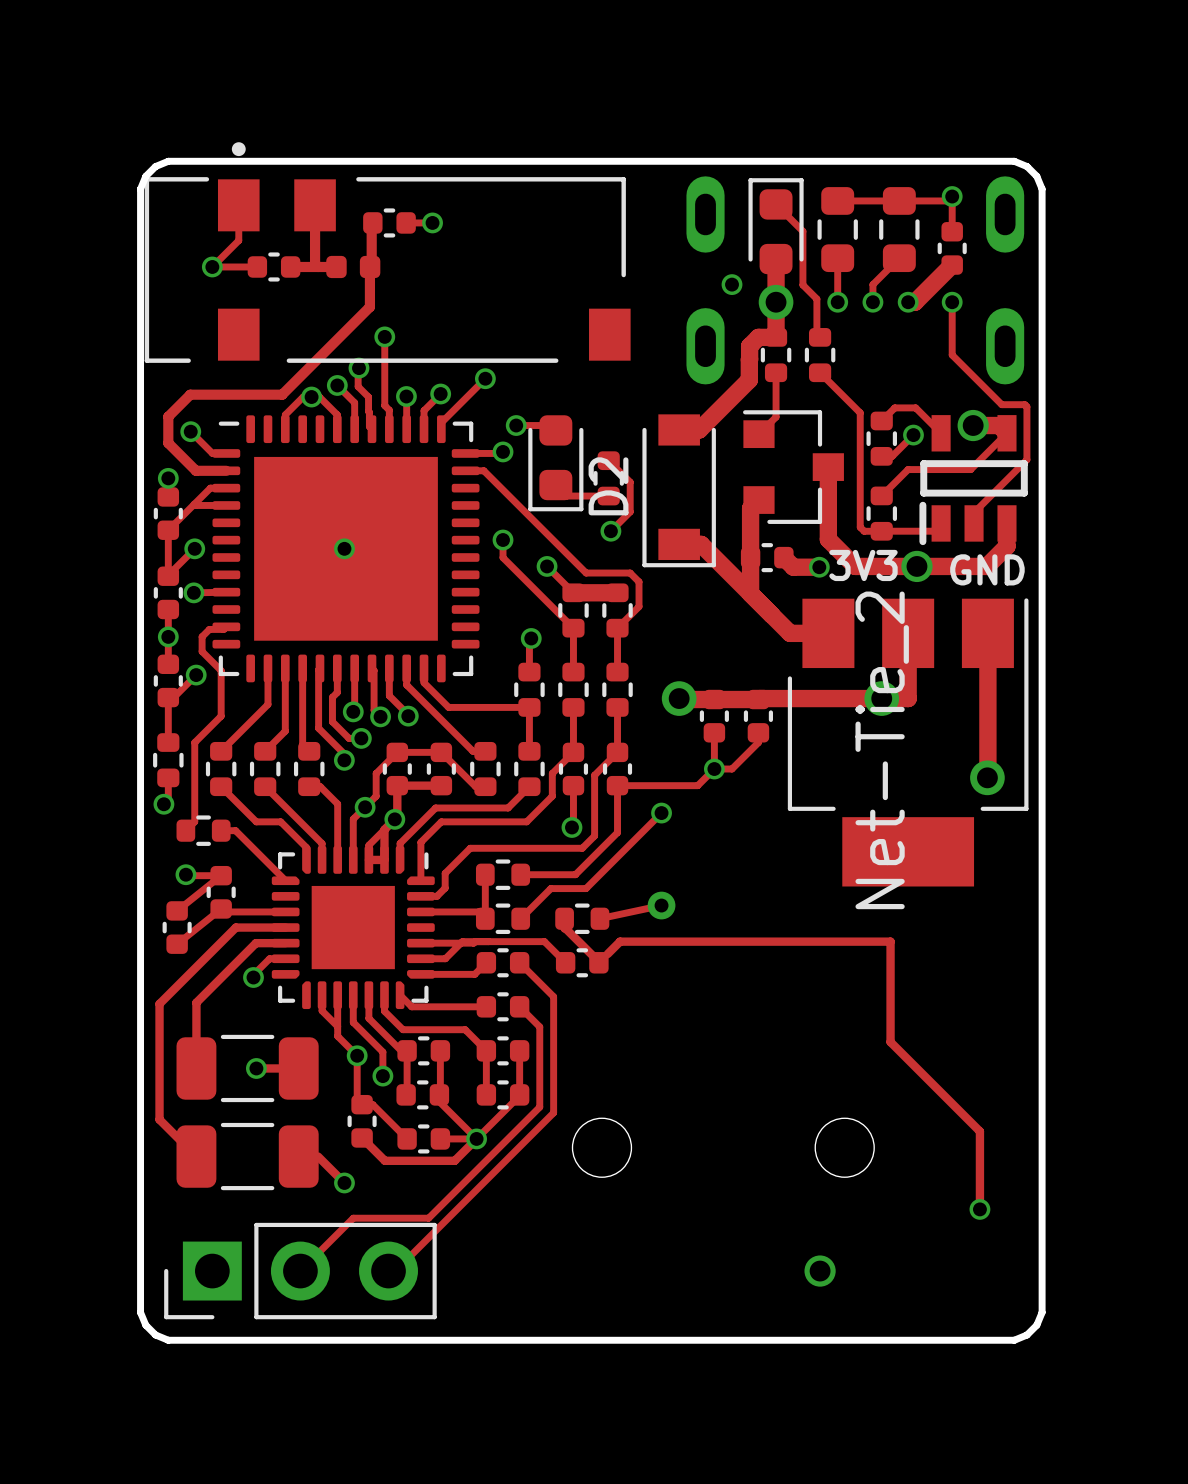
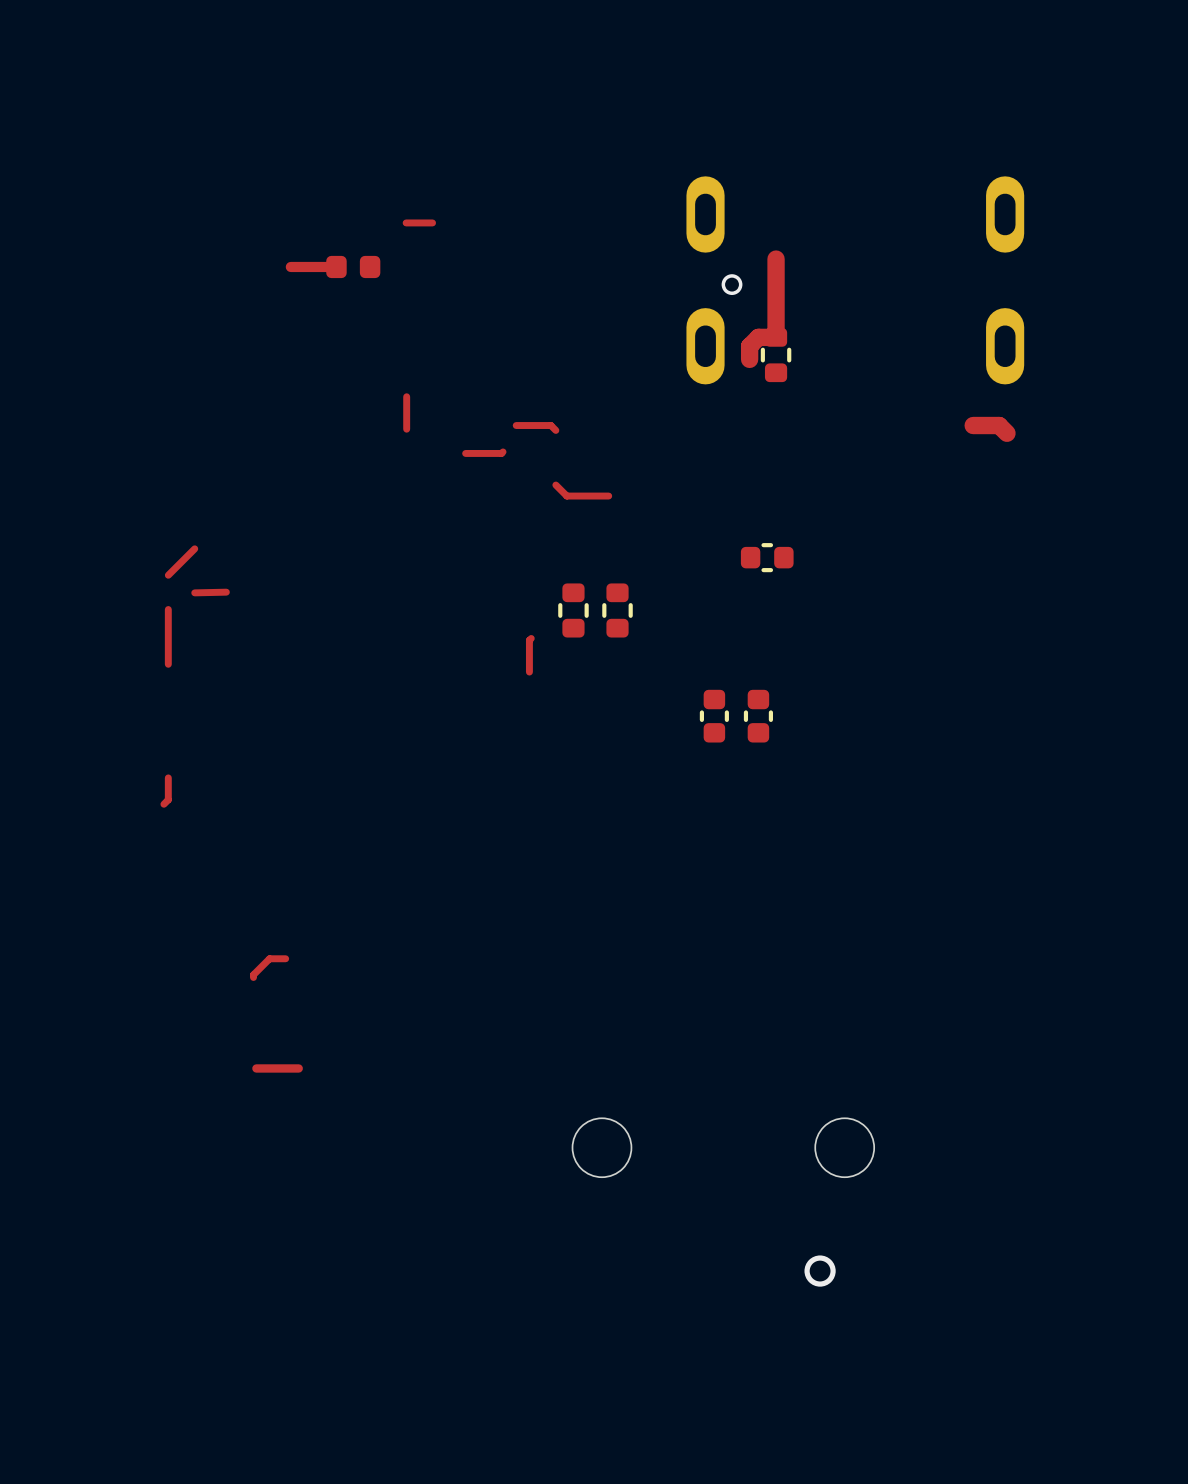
board edge: (168, 161) (1014, 161) (1027, 166) (1036, 176) (1042, 189) (1042, 1312) (1036, 1325) (1027, 1334) (1014, 1340) (168, 1340) (155, 1334) (145, 1325) (140, 1312) (140, 189) (145, 176) (155, 166) (168, 161) -> none
via: (952, 196) -> none
track: (837, 200) (947, 200) (952, 196) (952, 231) -> none
track: (776, 204) (802, 231) (802, 285) (816, 299) (816, 334) (820, 337) -> none
track: (238, 205) (238, 240) (212, 266) (257, 266) -> none
track: (315, 205) (315, 264) (318, 266) -> none
track: (371, 222) (369, 306) (282, 394) (190, 394) (168, 416) (168, 443) (195, 470) (226, 470) -> none
part: (389, 222) -> none
via: (432, 222) -> none
part: (776, 226) -> none
part: (837, 229) -> none
part: (899, 229) -> none
part: (952, 248) -> none
part: (387, 252) -> none
track: (837, 258) (837, 302) -> none
track: (899, 258) (872, 284) (872, 302) -> none
track: (952, 265) (915, 302) (908, 302) -> none
via: (212, 266) -> none
part: (274, 266) -> none
via: (776, 302) -> none
via: (837, 302) -> none
via: (872, 302) -> none
via: (908, 302) -> none
track: (952, 302) (952, 355) (1001, 404) (1024, 404) (1026, 406) (1026, 459) (974, 512) (974, 523) -> none
via: (952, 302) -> none
track: (384, 336) (384, 405) (389, 410) (389, 429) -> none
via: (384, 336) -> none
part: (820, 355) -> none
track: (749, 359) (749, 379) (699, 429) (679, 429) -> none
via: (358, 368) -> none
track: (776, 372) (776, 417) (758, 434) -> none
track: (820, 372) (860, 412) (860, 527) (864, 531) (933, 531) (941, 523) -> none
track: (358, 375) (358, 386) (368, 397) (369, 426) (372, 429) -> none
track: (485, 378) (441, 422) (441, 429) -> none
via: (485, 378) -> none
track: (337, 385) (354, 402) (354, 429) -> none
via: (337, 385) -> none
track: (440, 394) (424, 410) (424, 429) -> none
via: (440, 394) -> none
via: (406, 396) -> none
via: (311, 397) -> none
track: (881, 420) (894, 407) (915, 407) (941, 433) -> none
via: (516, 425) -> none
via: (973, 425) -> none
track: (285, 429) (285, 414) (303, 397) (319, 397) (337, 414) (337, 429) -> none
track: (190, 431) (212, 453) (226, 453) -> none
via: (190, 431) -> none
track: (1005, 434) (970, 469) (908, 469) (881, 495) -> none
track: (913, 435) (892, 456) (881, 456) -> none
via: (913, 435) -> none
part: (881, 438) -> none
via: (503, 451) -> none
track: (608, 460) (630, 482) (630, 511) (610, 531) -> none
part: (555, 463) -> none
part: (793, 467) -> none
track: (828, 467) (828, 539) (855, 566) (986, 566) (1006, 546) (1006, 523) -> none
track: (465, 470) (483, 470) (586, 573) (630, 573) (639, 581) (639, 606) (617, 628) (617, 672) -> none
via: (168, 478) -> none
part: (608, 478) -> none
part: (973, 480) -> none
track: (226, 488) (210, 488) (168, 530) (168, 576) -> none
D2: (679, 490) -> none
track: (758, 500) (750, 508) (750, 593) -> none
track: (194, 504) (226, 505) -> none
part: (168, 513) -> none
part: (881, 513) -> none
via: (610, 531) -> none
track: (503, 540) (503, 557) (573, 628) (573, 672) -> none
via: (503, 540) -> none
track: (679, 544) (701, 544) (790, 633) (828, 633) -> none
via: (194, 548) -> none
via: (344, 548) -> none
part: (346, 548) -> none
track: (783, 557) (793, 567) (819, 567) -> none
track: (547, 566) (573, 592) (617, 592) -> none
via: (547, 566) -> none
via: (916, 566) -> none
via: (819, 567) -> none
drawing: [855, 591, 909, 910] -> none
part: (168, 592) -> none
via: (193, 592) -> none
track: (226, 626) (223, 629) (209, 629) (202, 636) (202, 651) (221, 670) (221, 716) (194, 742) (194, 821) (185, 830) -> none
track: (908, 633) (908, 698) (679, 698) -> none
track: (987, 633) (987, 777) -> none
via: (168, 636) -> none
via: (531, 638) -> none
track: (267, 668) (267, 704) (221, 751) -> none
track: (285, 668) (285, 731) (265, 751) -> none
track: (302, 668) (302, 744) (309, 751) -> none
track: (319, 668) (318, 728) (344, 754) (344, 760) -> none
track: (337, 668) (337, 692) (332, 697) (332, 721) (349, 738) (361, 738) -> none
track: (354, 668) (353, 711) -> none
track: (372, 668) (374, 670) (374, 710) (380, 716) -> none
track: (389, 668) (389, 695) (408, 716) -> none
track: (406, 668) (406, 685) (472, 751) (485, 751) -> none
track: (424, 668) (424, 682) (448, 707) (529, 707) (529, 751) -> none
track: (196, 675) (173, 697) (168, 697) (168, 742) -> none
via: (196, 675) -> none
part: (168, 680) -> none
part: (529, 689) -> none
part: (573, 689) -> none
part: (617, 689) -> none
via: (679, 698) -> none
via: (881, 698) -> none
track: (574, 706) (573, 752) (552, 773) (552, 796) (526, 821) (441, 821) (420, 842) (420, 880) -> none
track: (617, 707) (617, 752) (594, 775) (594, 835) (582, 848) (470, 848) (445, 873) (445, 888) (436, 896) (420, 896) -> none
via: (353, 711) -> none
via: (380, 716) -> none
via: (408, 716) -> none
track: (714, 732) (714, 769) -> none
track: (758, 732) (758, 742) (732, 769) (714, 769) -> none
via: (361, 738) -> none
part: (908, 742) -> none
part: (168, 760) -> none
via: (344, 760) -> none
part: (221, 769) -> none
part: (265, 769) -> none
part: (309, 769) -> none
part: (397, 769) -> none
part: (441, 769) -> none
part: (485, 769) -> none
part: (529, 769) -> none
part: (573, 769) -> none
part: (617, 769) -> none
track: (714, 769) (697, 785) (617, 785) (617, 832) (575, 874) (520, 874) -> none
via: (714, 769) -> none
via: (987, 777) -> none
track: (441, 785) (397, 785) (397, 816) (384, 829) (384, 859) (368, 859) (368, 845) (394, 819) -> none
track: (573, 785) (571, 827) -> none
track: (221, 786) (256, 821) (280, 821) (306, 847) (306, 859) -> none
track: (265, 786) (322, 843) (322, 859) -> none
track: (309, 786) (320, 786) (337, 804) (337, 859) -> none
track: (485, 786) (475, 786) (441, 752) (397, 752) (376, 773) (376, 796) (353, 819) (353, 859) -> none
track: (529, 786) (508, 807) (435, 807) (400, 843) (400, 859) -> none
via: (163, 804) -> none
via: (365, 807) -> none
track: (661, 813) (586, 888) (550, 888) (520, 918) -> none
via: (661, 813) -> none
via: (394, 819) -> none
via: (571, 827) -> none
part: (203, 830) -> none
track: (221, 830) (235, 830) (285, 880) -> none
track: (185, 874) (221, 875) (177, 910) -> none
via: (185, 874) -> none
track: (485, 874) (485, 918) (478, 911) (420, 911) -> none
part: (503, 874) -> none
part: (221, 892) -> none
track: (661, 905) (599, 918) -> none
via: (661, 905) -> none
track: (285, 911) (224, 911) (221, 908) (177, 944) -> none
part: (503, 918) -> none
track: (564, 918) (564, 928) (598, 962) (620, 941) (890, 941) (890, 1042) (979, 1131) (979, 1209) (978, 1208) -> none
part: (582, 918) -> none
part: (177, 927) -> none
track: (285, 927) (235, 927) (159, 1003) (159, 1119) (196, 1156) -> none
part: (353, 927) -> none
track: (475, 941) (420, 943) -> none
track: (285, 943) (255, 943) (196, 1002) (196, 1068) -> none
track: (420, 958) (445, 958) (462, 941) (544, 941) (565, 962) -> none
track: (486, 962) (474, 974) (420, 974) -> none
part: (503, 962) -> none
track: (519, 962) (553, 996) (553, 1112) (395, 1271) (388, 1271) -> none
part: (582, 962) -> none
via: (253, 977) -> none
track: (322, 995) (322, 1010) (337, 1026) -> none
track: (337, 995) (337, 1036) (357, 1055) (357, 1099) (362, 1104) (372, 1104) (407, 1138) -> none
track: (353, 995) (353, 1022) (382, 1052) (382, 1076) -> none
track: (368, 995) (368, 1018) (401, 1050) (407, 1050) (406, 1094) -> none
track: (384, 995) (384, 1011) (402, 1029) (465, 1029) (486, 1050) (486, 1094) -> none
track: (400, 995) (411, 1006) (486, 1006) -> none
part: (503, 1006) -> none
track: (519, 1006) (539, 1026) (539, 1107) (428, 1218) (353, 1218) (300, 1271) -> none
part: (423, 1050) -> none
track: (440, 1050) (439, 1101) (476, 1138) -> none
part: (503, 1050) -> none
track: (519, 1050) (519, 1095) (476, 1138) -> none
via: (357, 1055) -> none
part: (247, 1068) -> none
via: (256, 1068) -> none
via: (382, 1076) -> none
part: (422, 1094) -> none
part: (503, 1094) -> none
part: (362, 1121) -> none
track: (362, 1137) (384, 1160) (454, 1160) (476, 1138) -> none
part: (423, 1138) -> none
track: (440, 1138) (476, 1138) -> none
via: (476, 1138) -> none
part: (247, 1156) -> none
track: (298, 1156) (318, 1156) (344, 1182) -> none
via: (344, 1182) -> none
via: (979, 1209) -> none
part: (300, 1271) -> none

